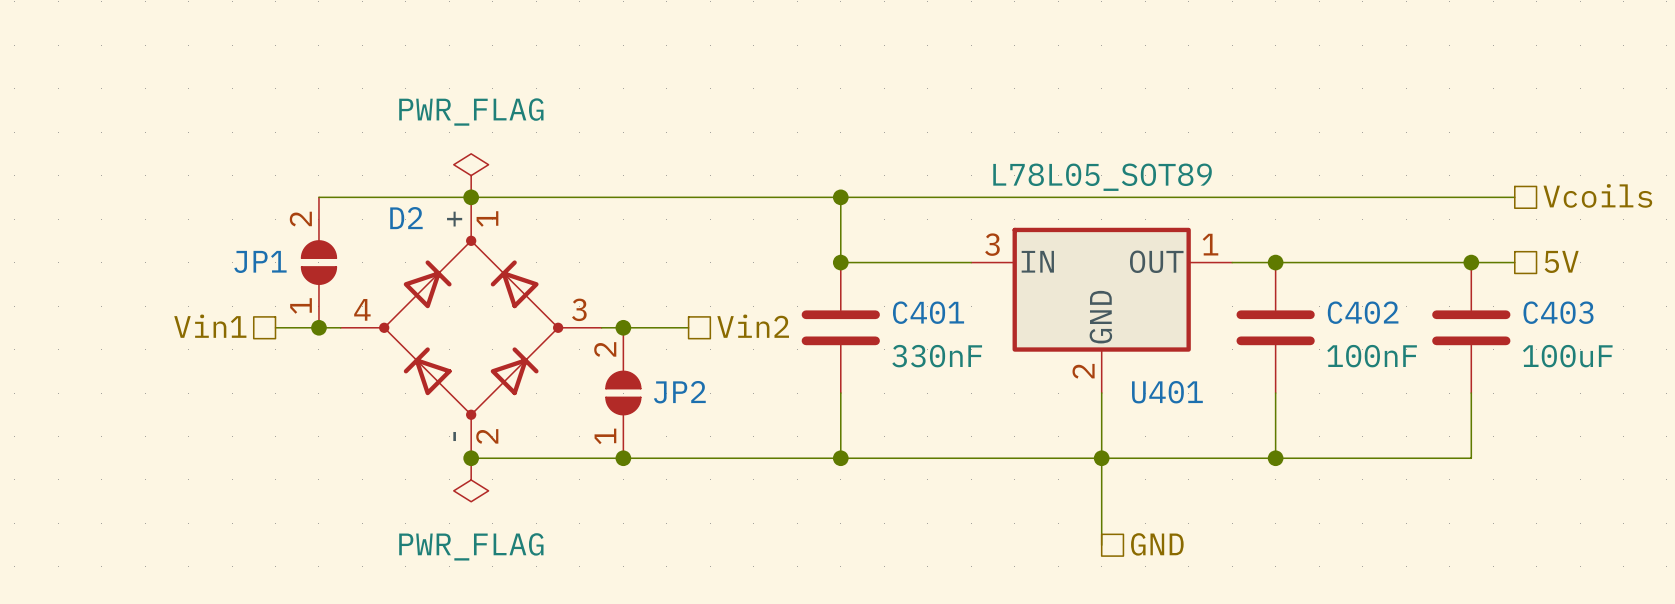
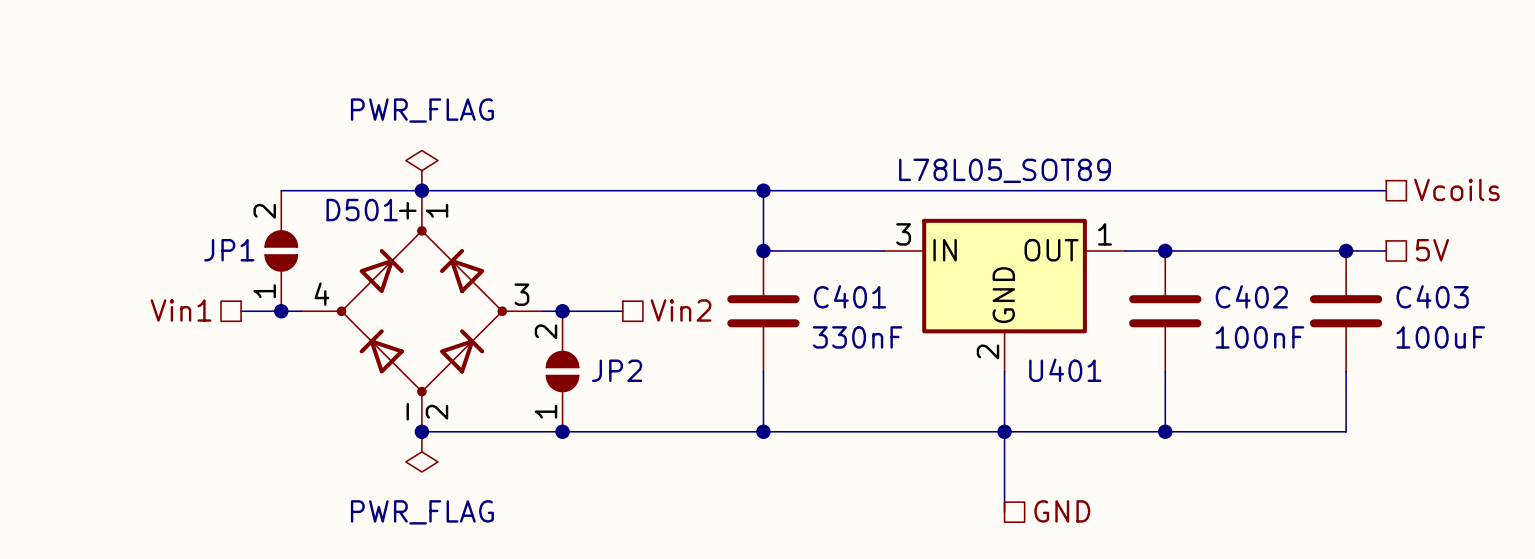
D2 name: D2 (406, 218) -> D501 (362, 210)

